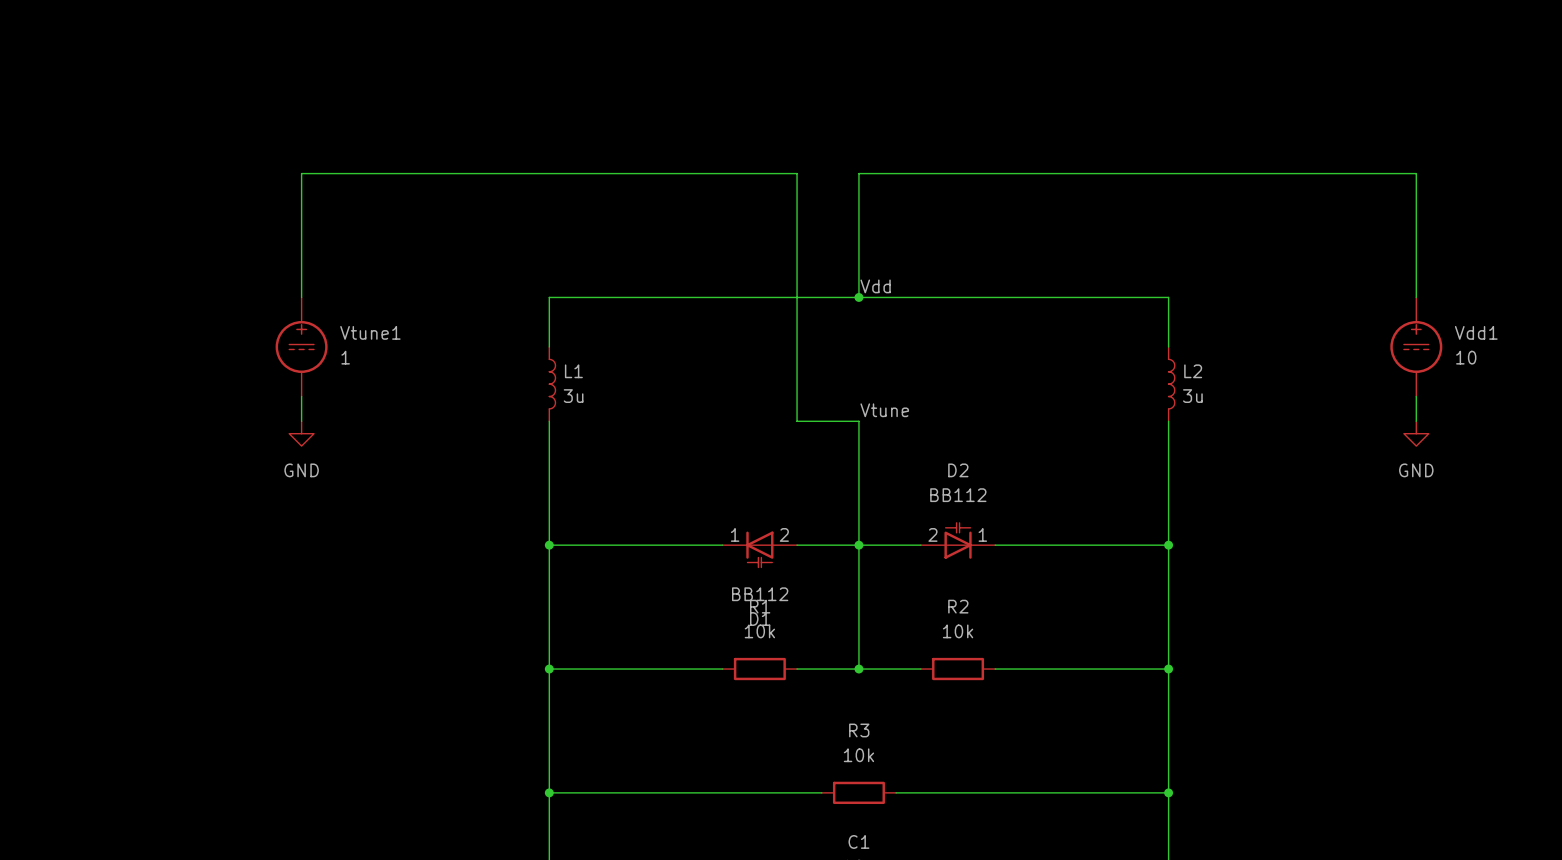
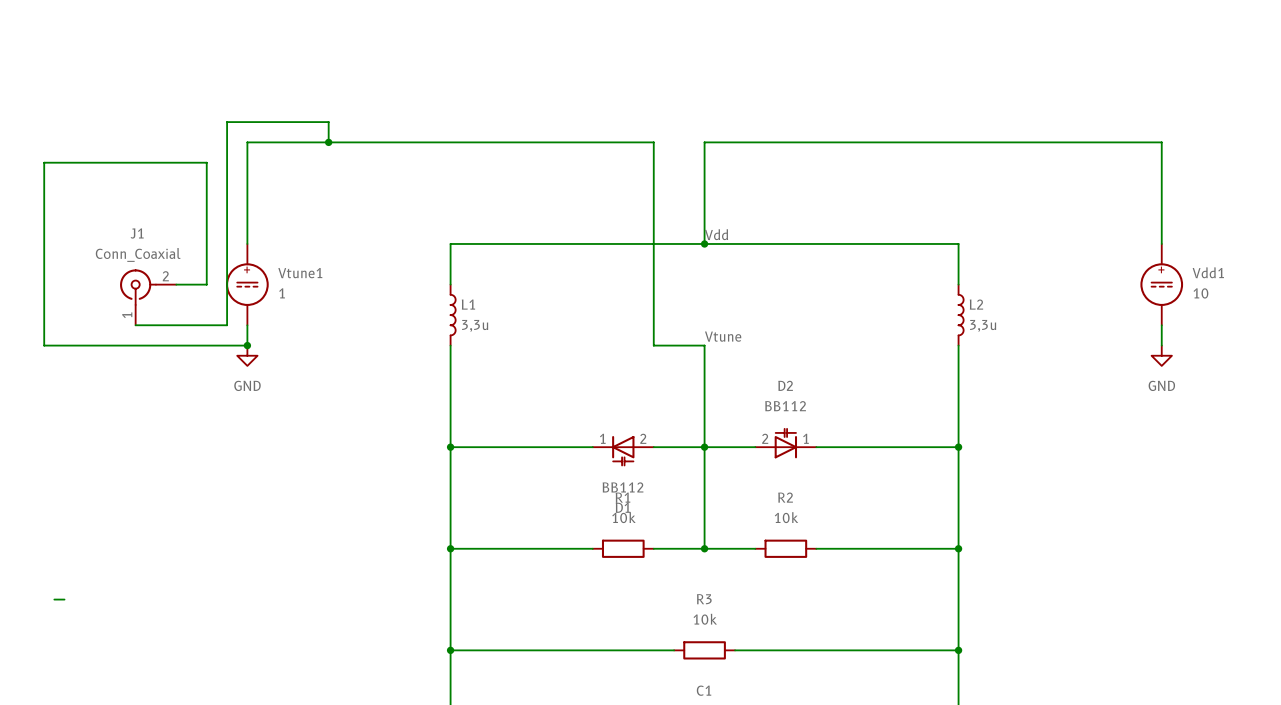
wire: none -> (328, 142) (328, 122) (227, 122) (227, 325) (135, 325)
junction: none -> (328, 142)
wire: none -> (176, 284) (206, 284) (206, 162) (44, 162) (44, 345) (247, 345)
J1: none -> Conn_Coaxial (148, 297)
L1 value: 3u (573, 396) -> 3,3u (475, 325)
L2 value: 3u (1192, 396) -> 3,3u (983, 325)
junction: none -> (247, 345)
wire: none -> (54, 599) (64, 599)

